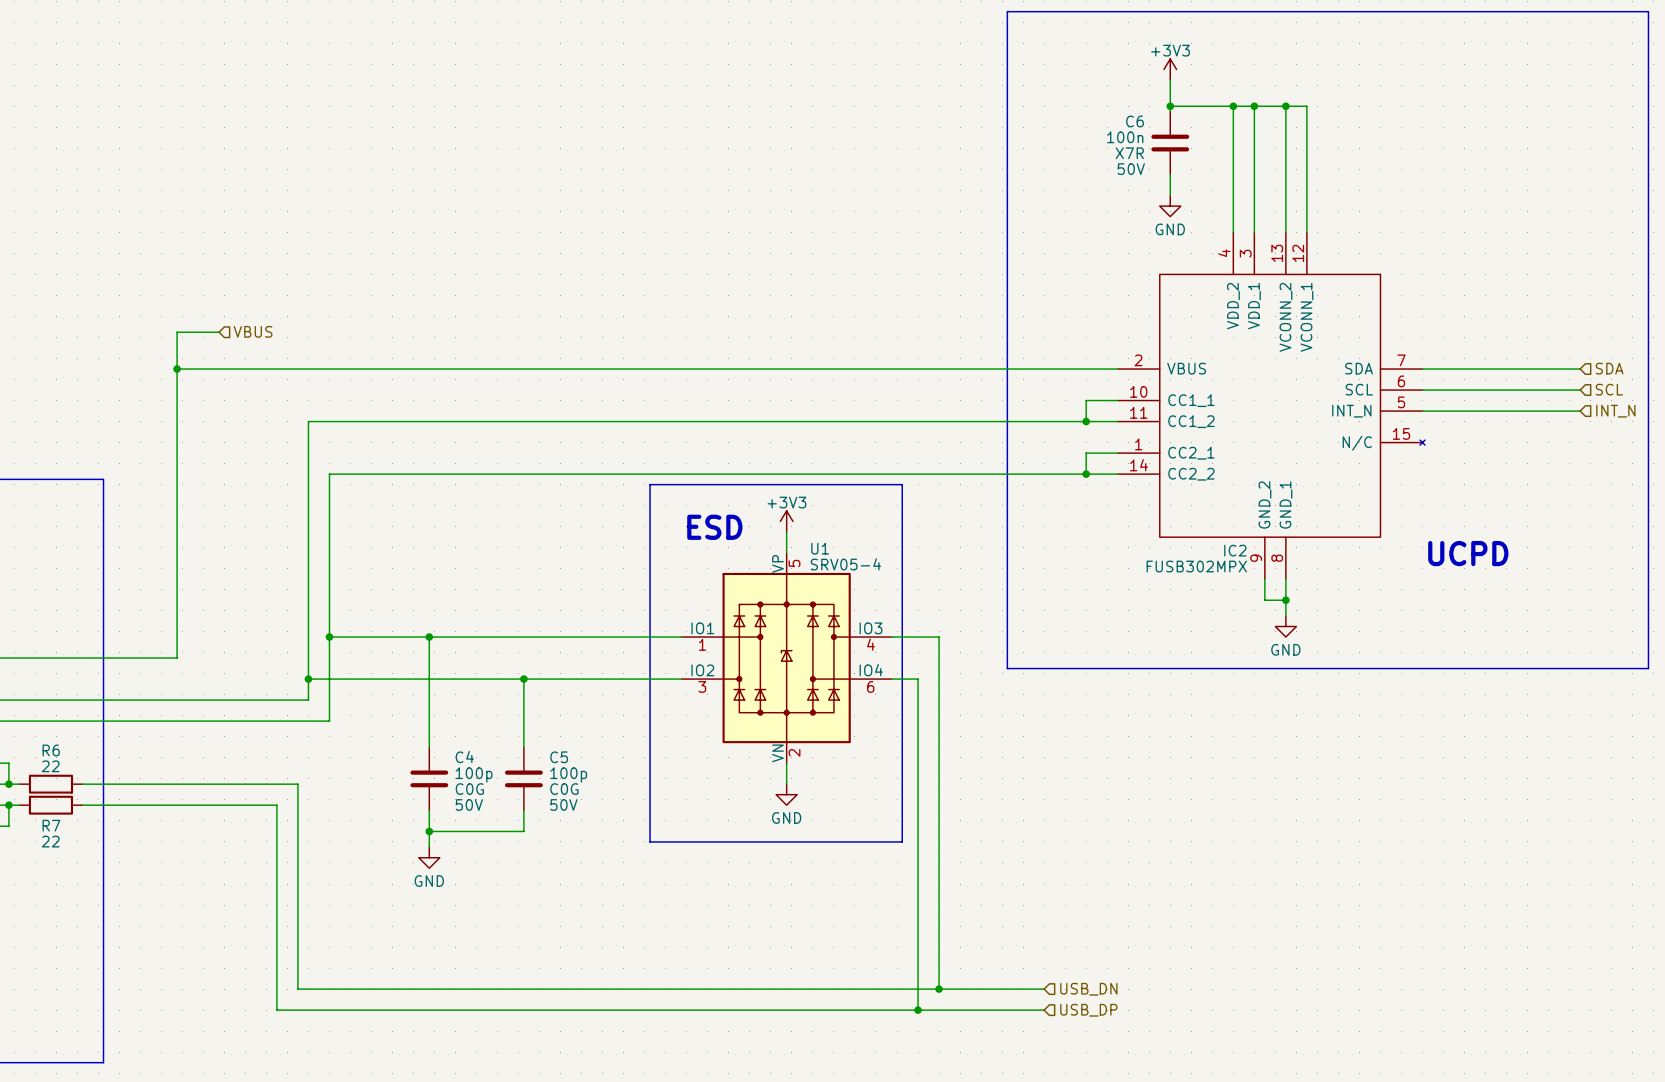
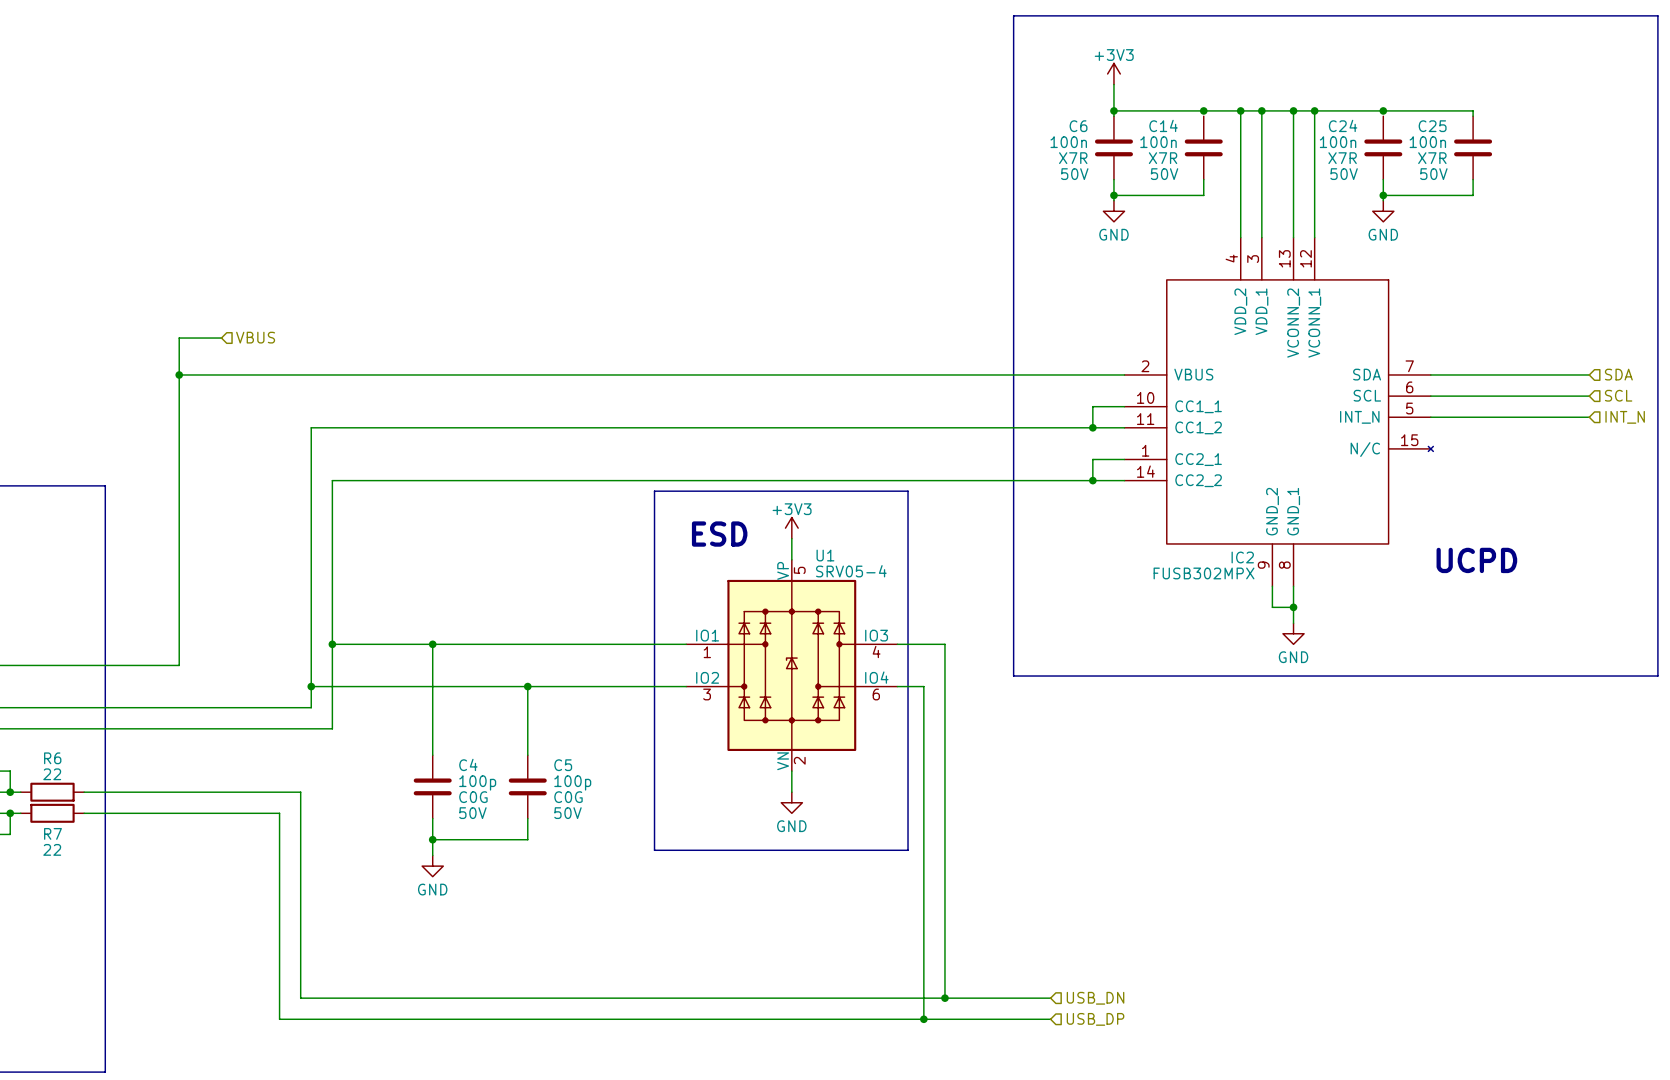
power symbol position: +3V3 (1170, 69) -> +3V3 (1113, 73)
wire: (1170, 79) (1170, 111) -> (1113, 84) (1113, 116)
wire: none -> (1113, 110) (1177, 110)
junction: none -> (1113, 110)
junction position: (1170, 106) -> (1203, 110)
wire: none -> (1314, 110) (1473, 110) (1473, 116)
junction: none -> (1314, 110)
junction: none -> (1383, 110)
C6 position: (1170, 143) -> (1113, 147)
C14: none -> 100n (1203, 147)
C24: none -> 100n (1383, 147)
C25: none -> 100n (1473, 147)
wire: (1170, 174) (1170, 195) -> (1113, 179) (1113, 200)
wire: none -> (1203, 179) (1203, 195) (1113, 195)
wire: none -> (1383, 179) (1383, 200)
wire: none -> (1473, 179) (1473, 195) (1383, 195)
junction: none -> (1113, 195)
junction: none -> (1383, 195)
power symbol position: GND (1170, 206) -> GND (1113, 211)
power symbol: none -> GND (1383, 211)

